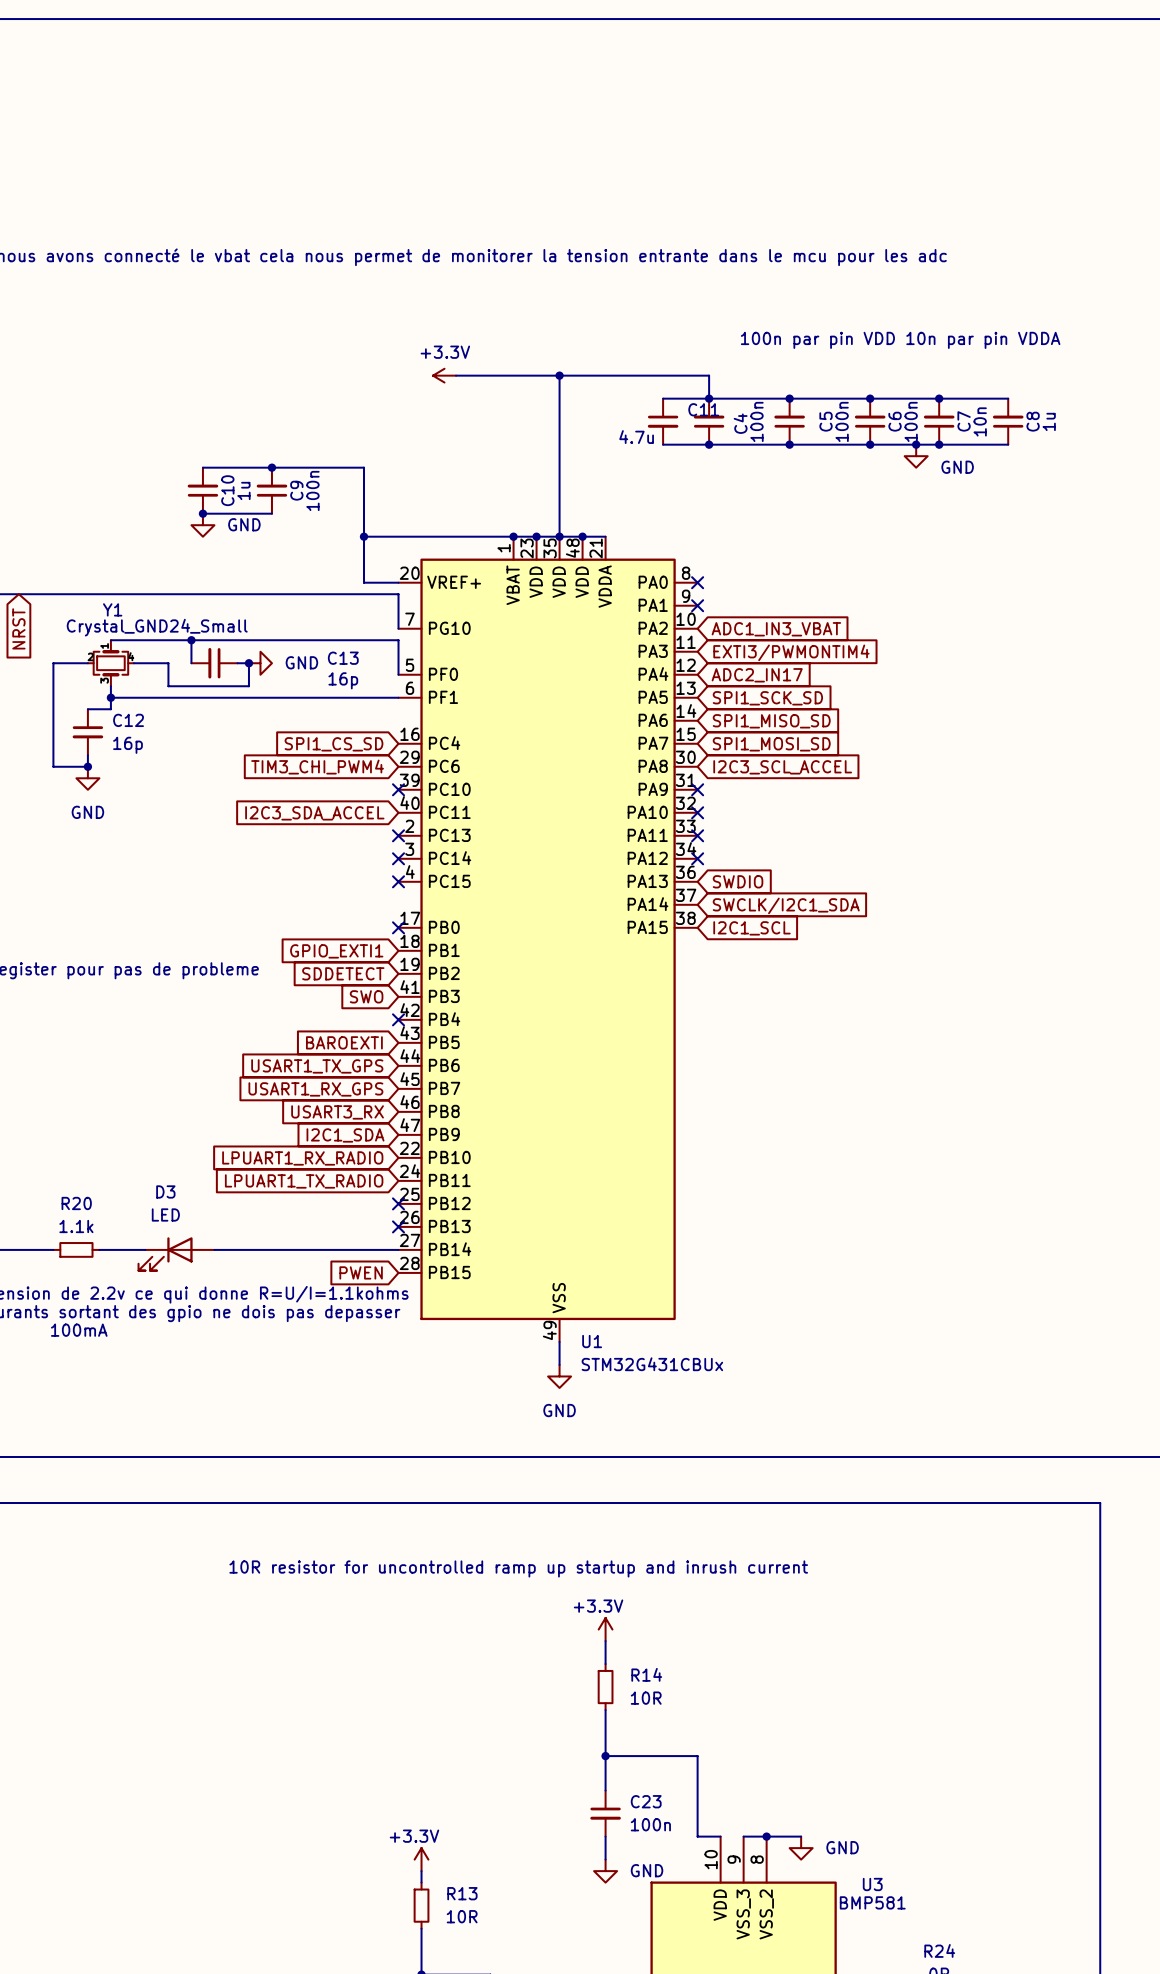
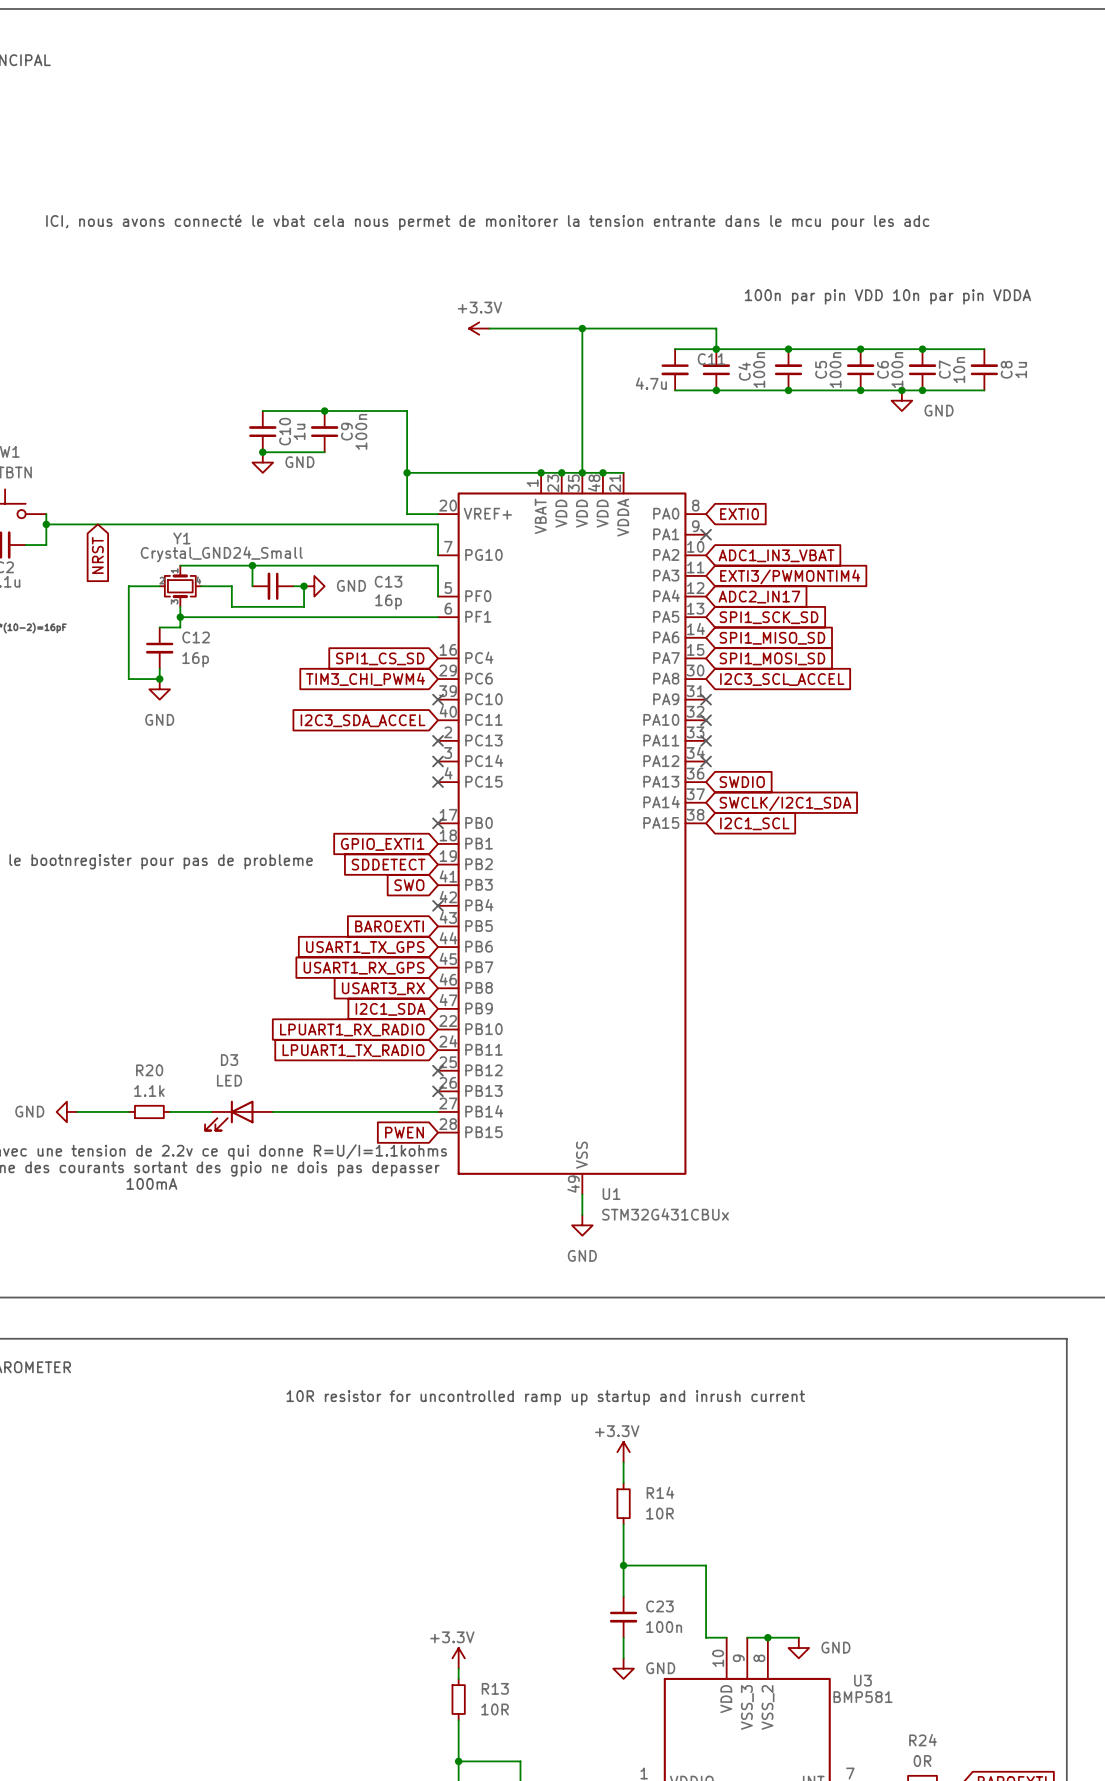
no-connect mark: (697, 582) -> none
global label: none -> EXTI0 (739, 514)

